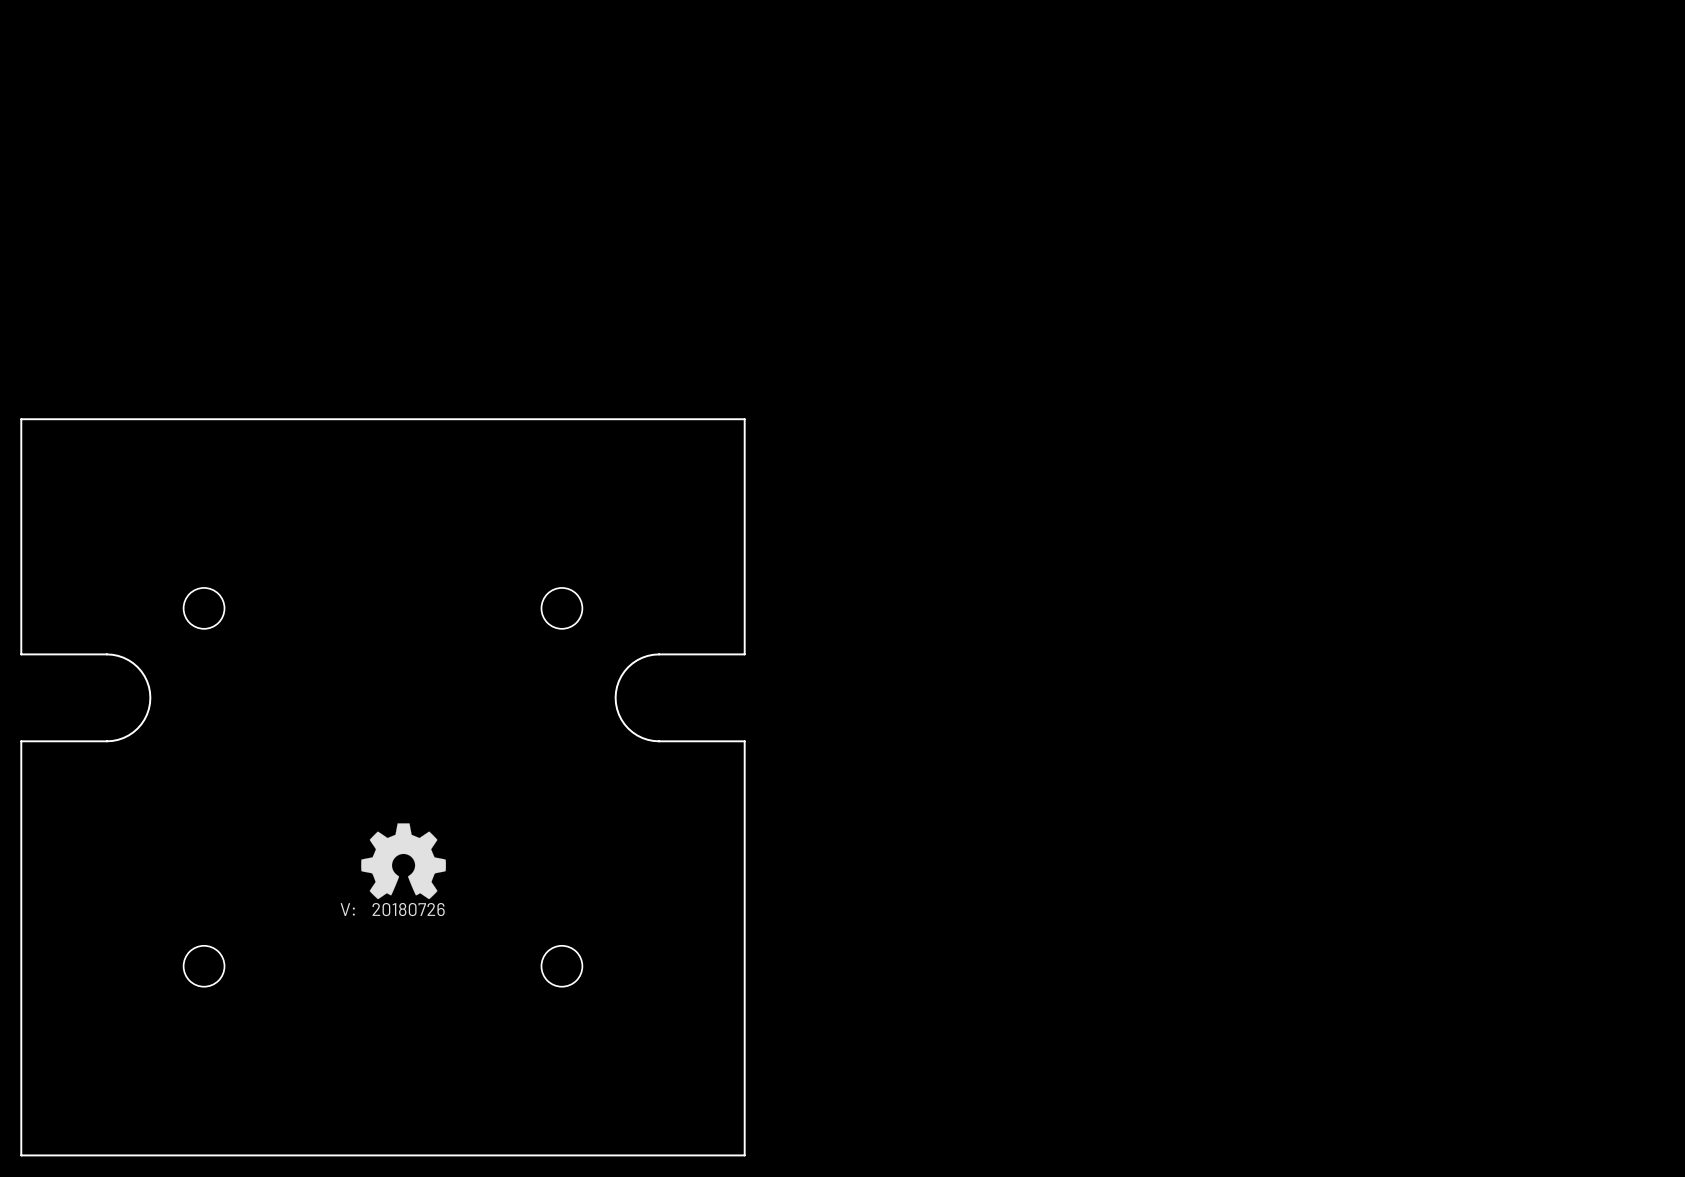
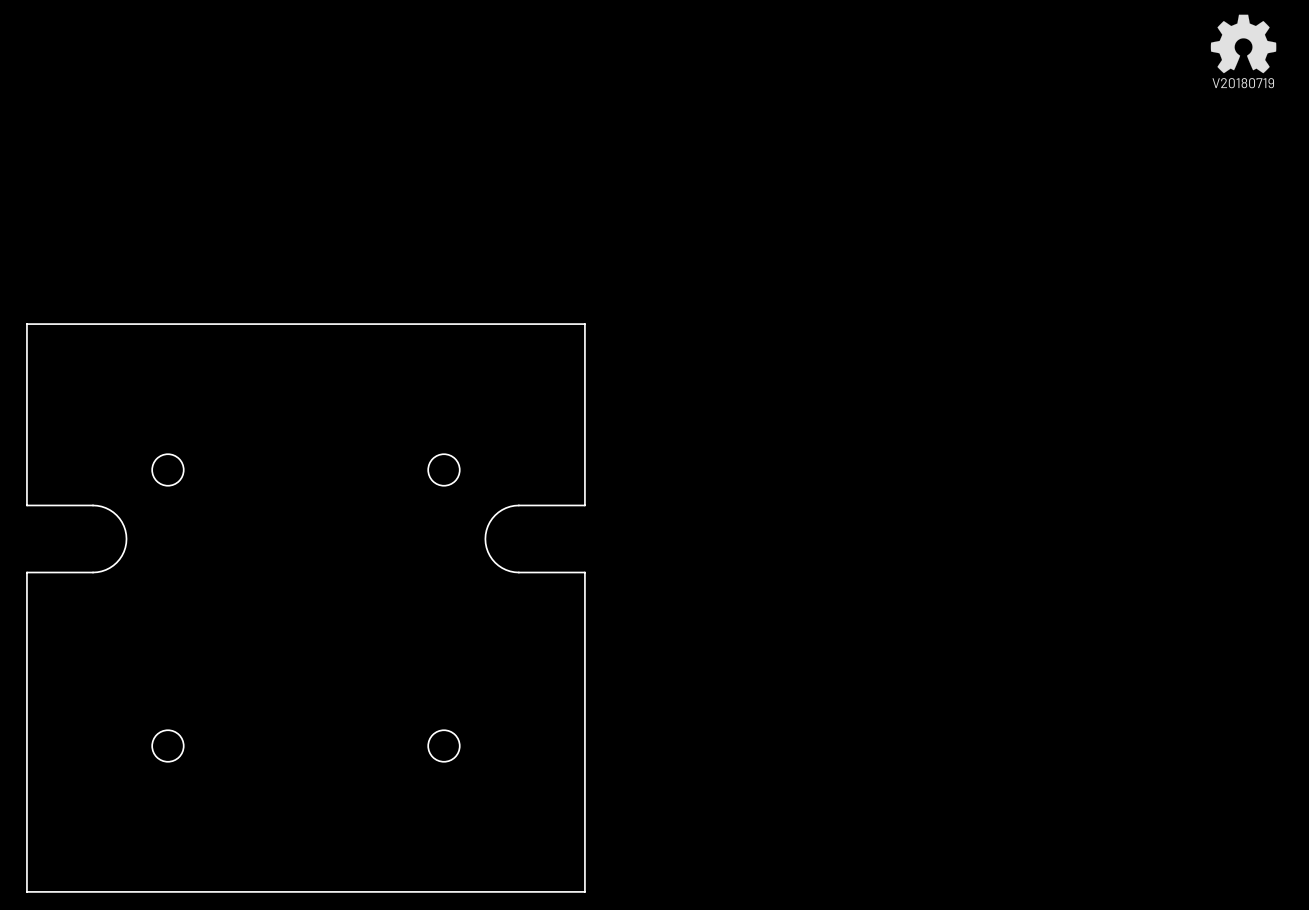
drawing: none -> [1210, 14, 1277, 74]
drawing: [361, 823, 446, 900] -> none

